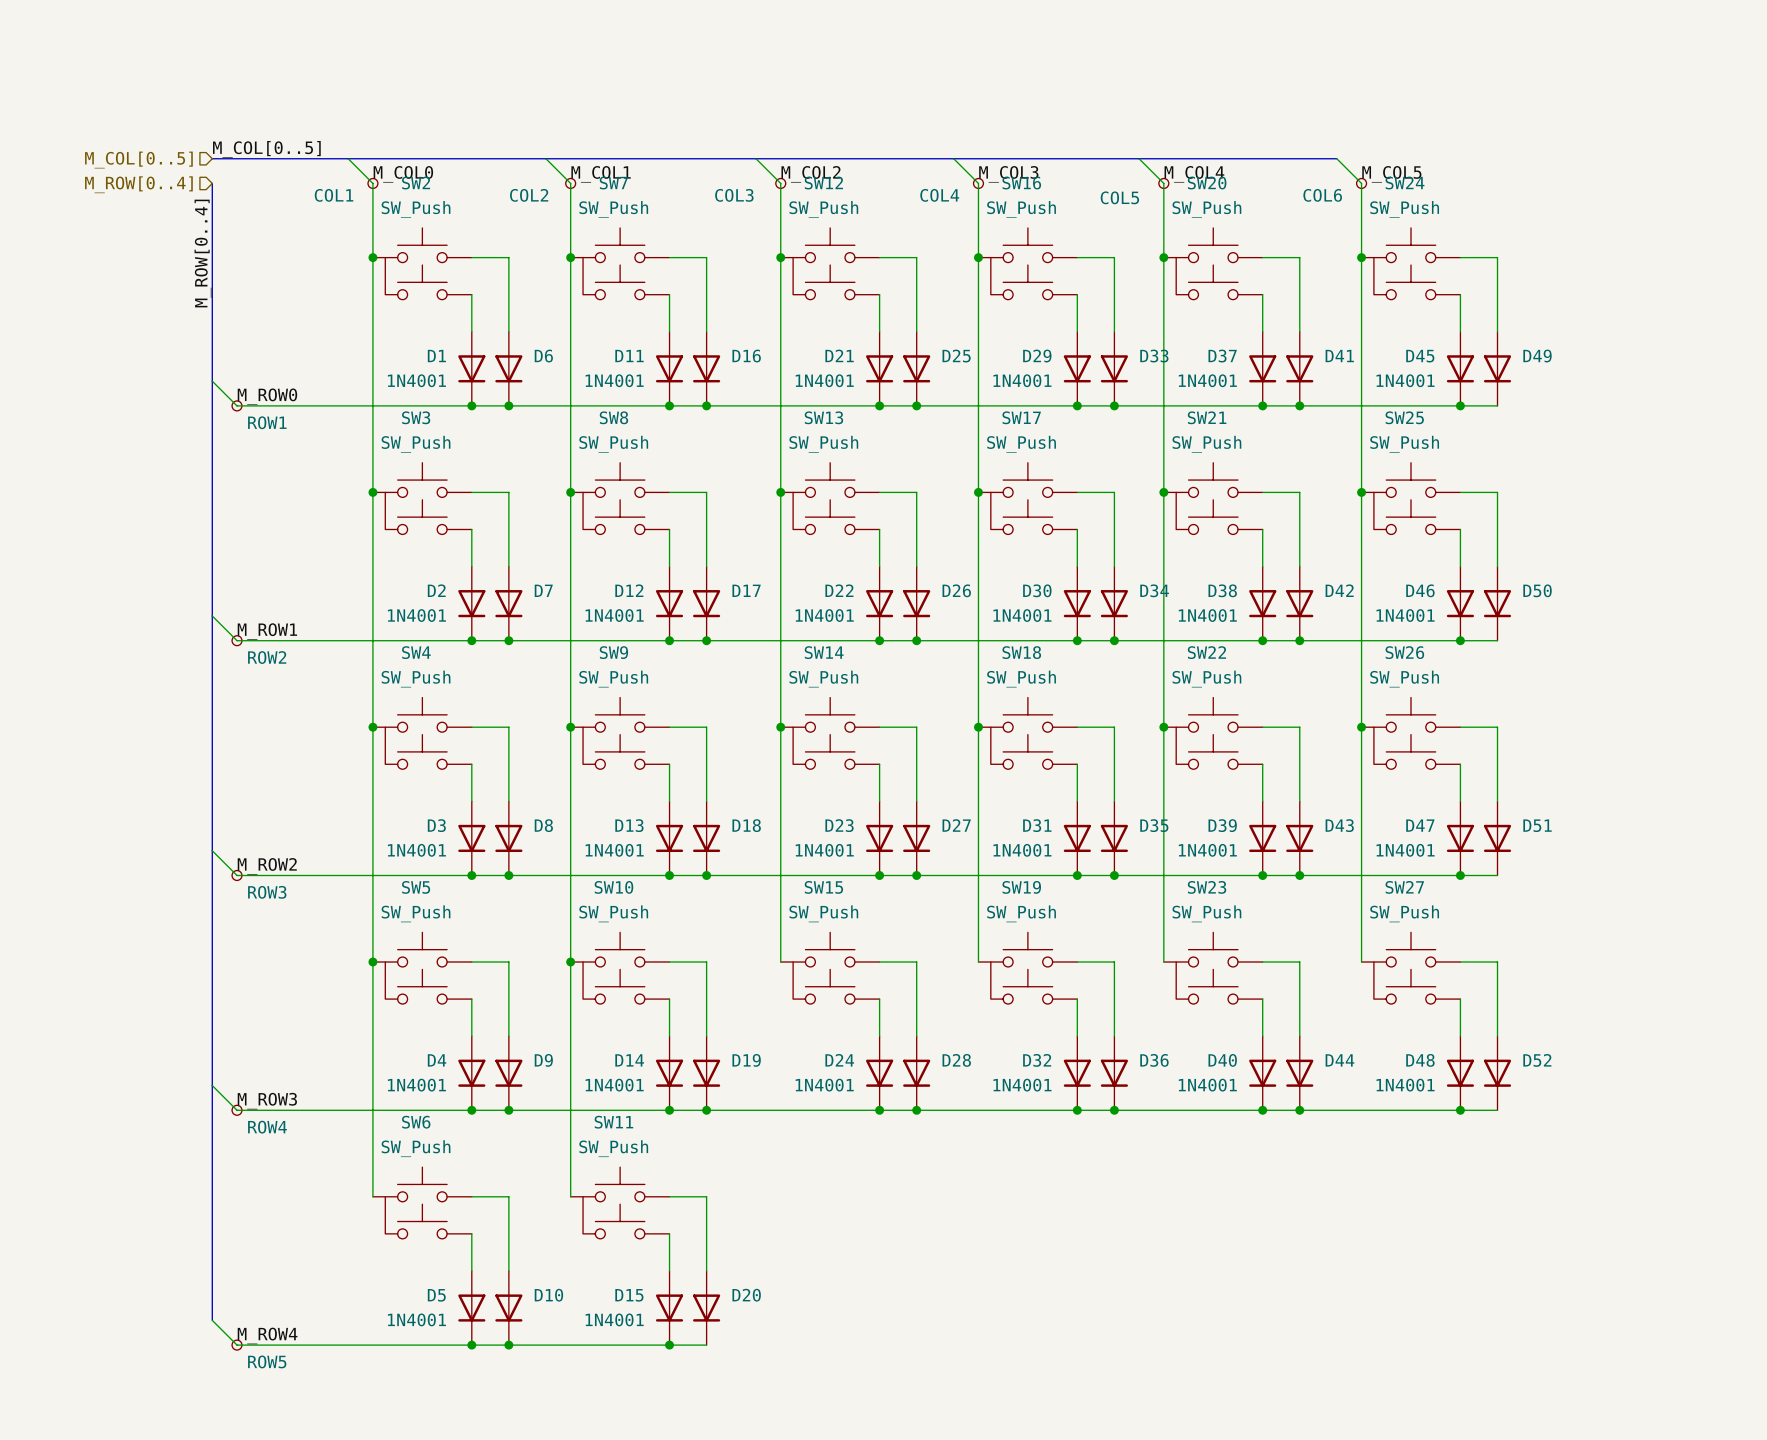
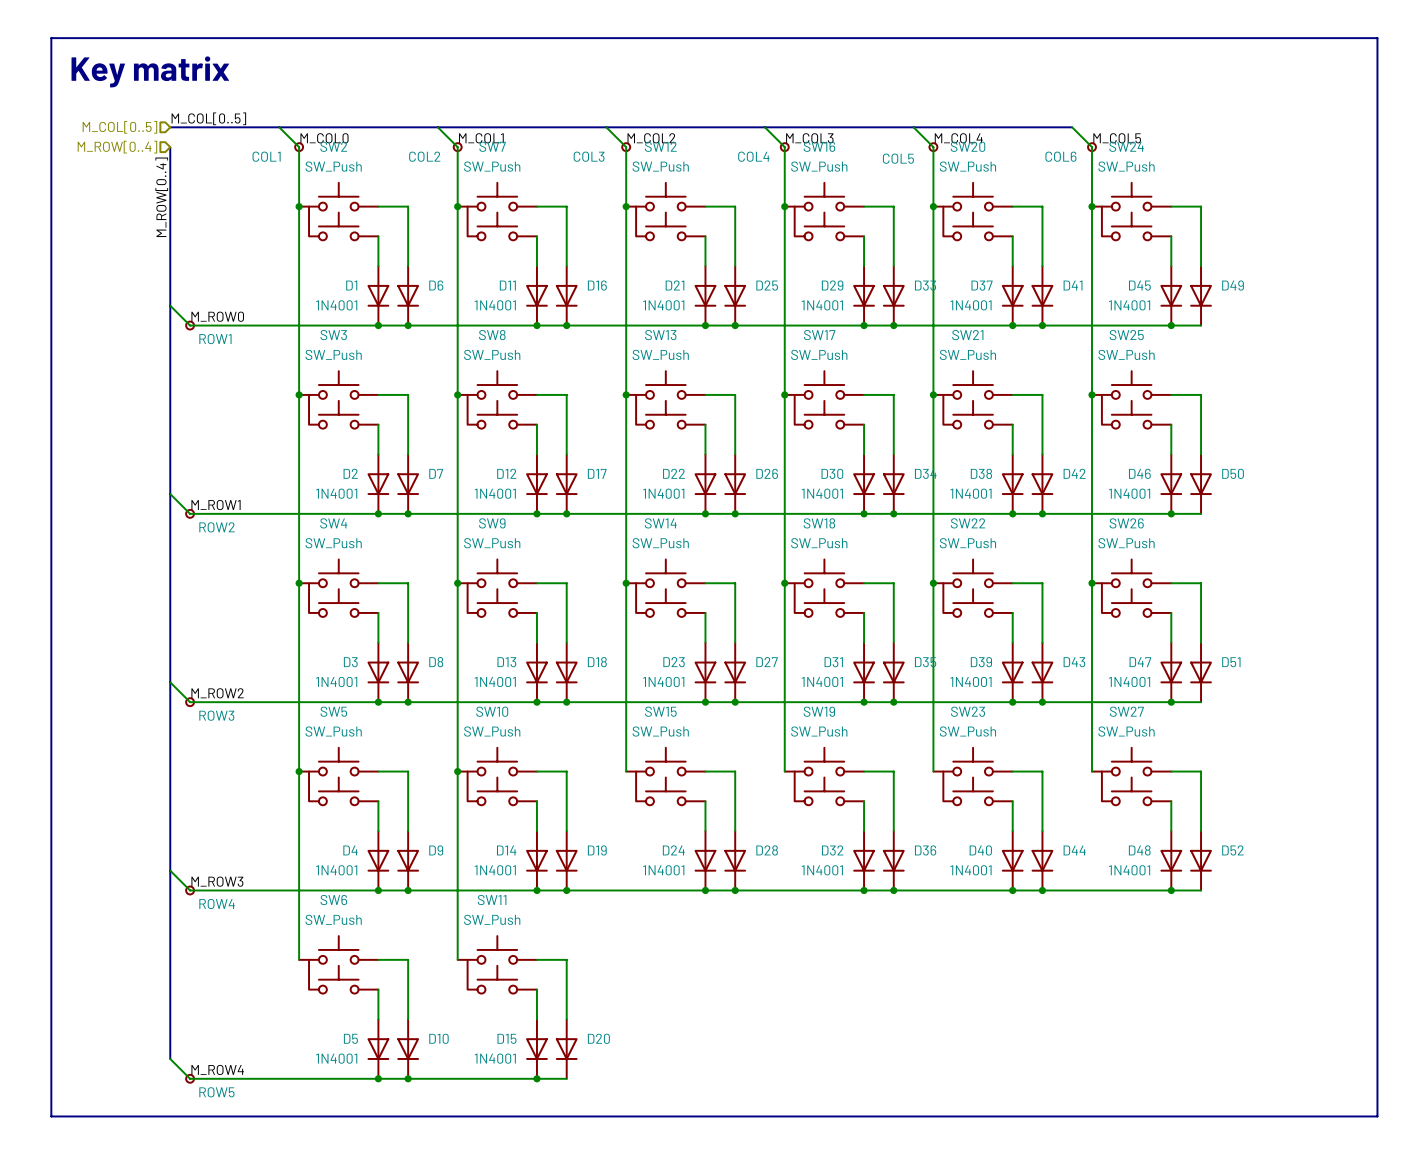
line: none -> (51, 38) (1377, 38) (1377, 1116) (51, 1116) (51, 38)
text: none -> Key matrix (150, 71)

